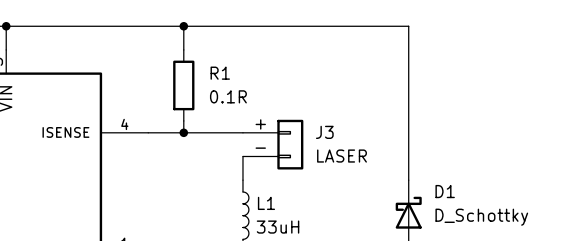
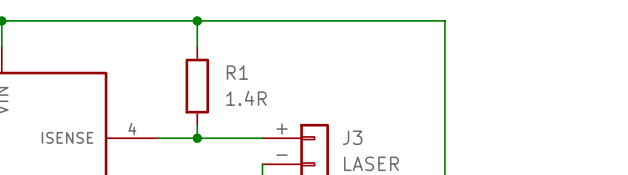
R1 value: 0.1R (228, 96) -> 1.4R (246, 98)

